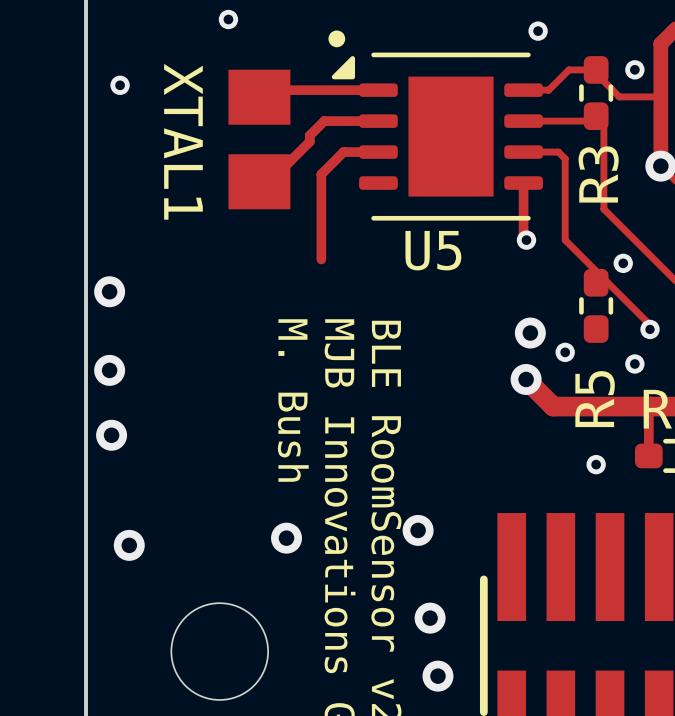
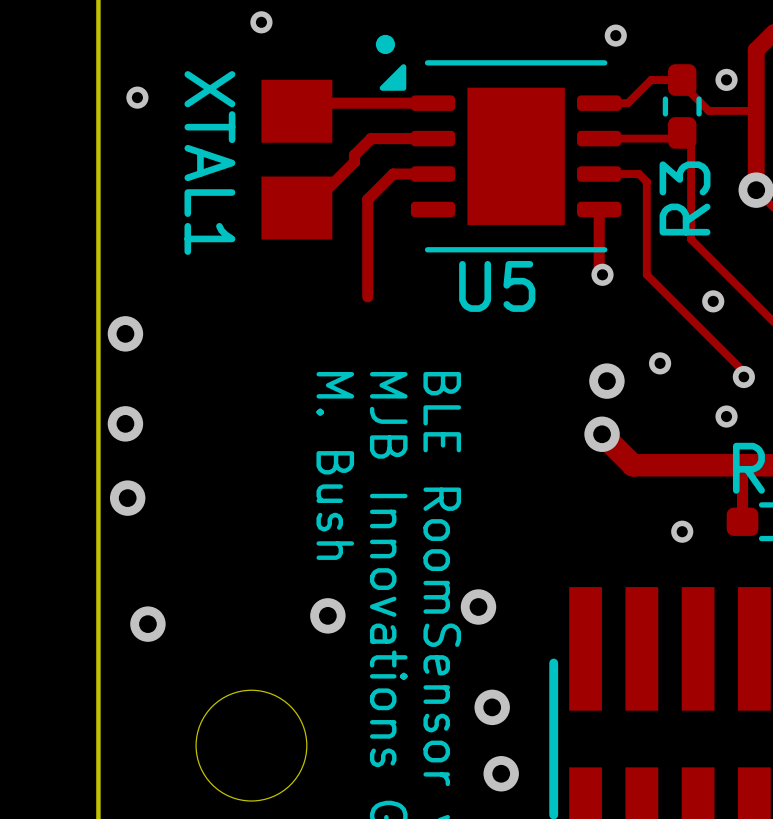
R5: (596, 305) -> none
via position: (565, 352) -> (660, 363)

